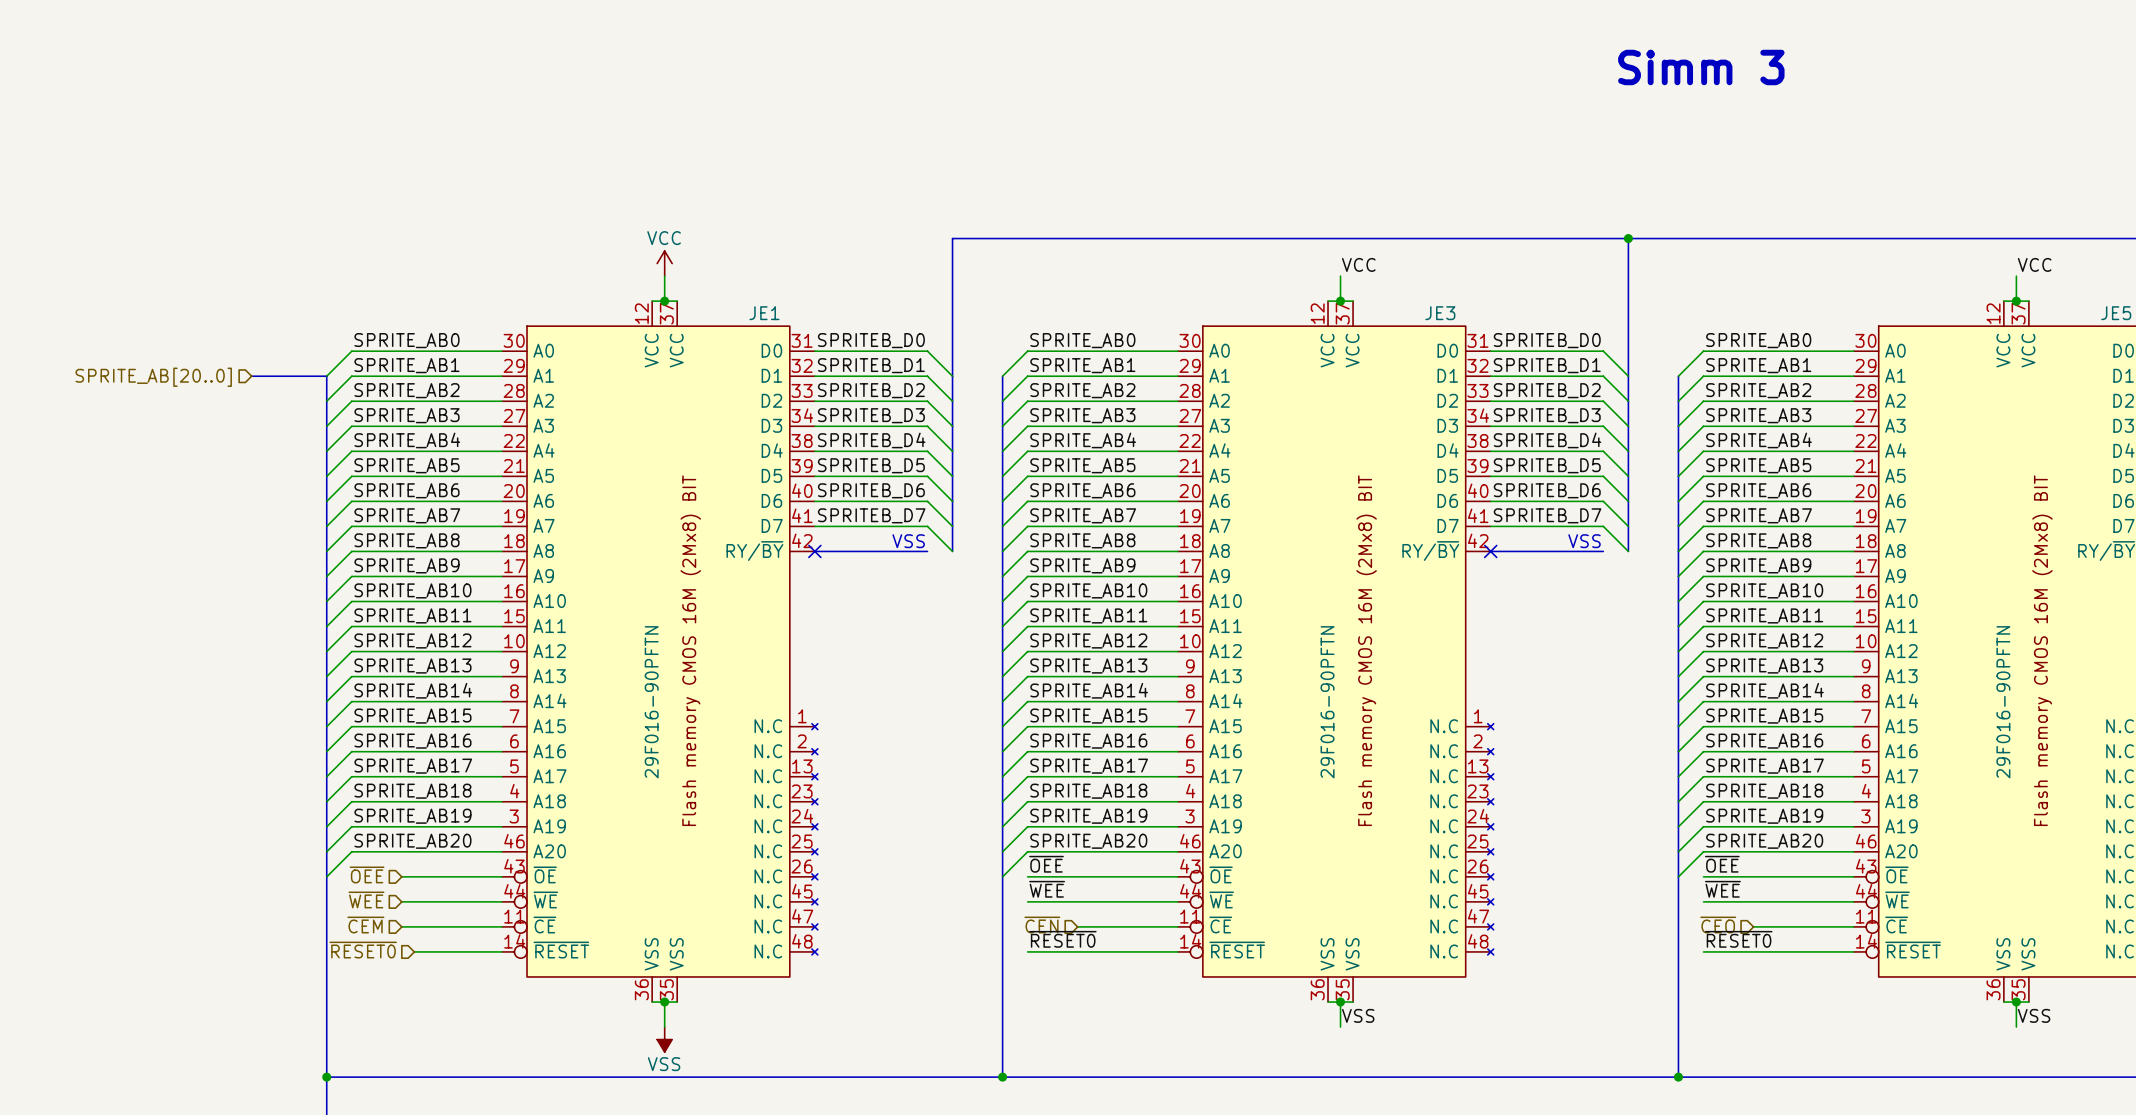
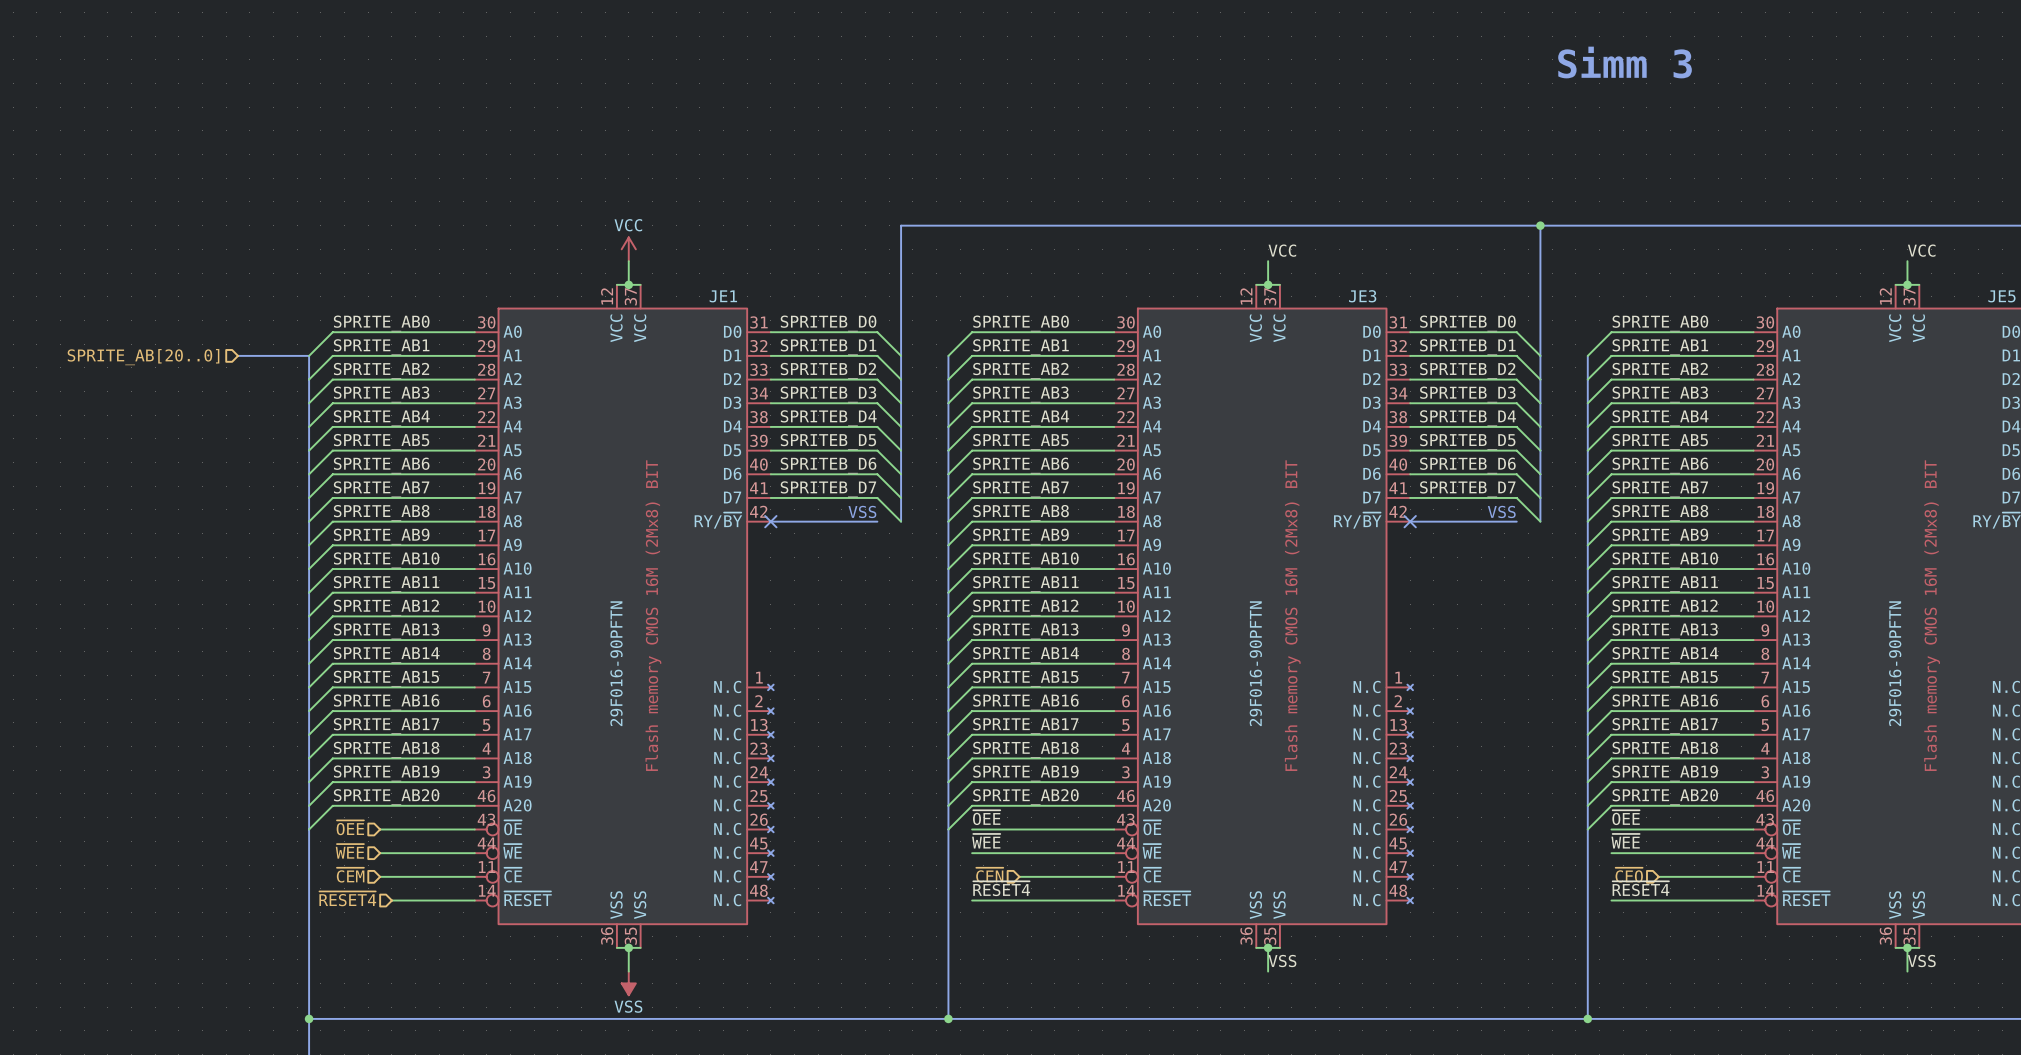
label: ~{RESET0} (1062, 939) -> ~{RESET4} (1001, 888)
label: ~{RESET0} (1738, 939) -> ~{RESET4} (1640, 888)
hierarchical label: ~{RESET0} (363, 950) -> ~{RESET4} (347, 898)

